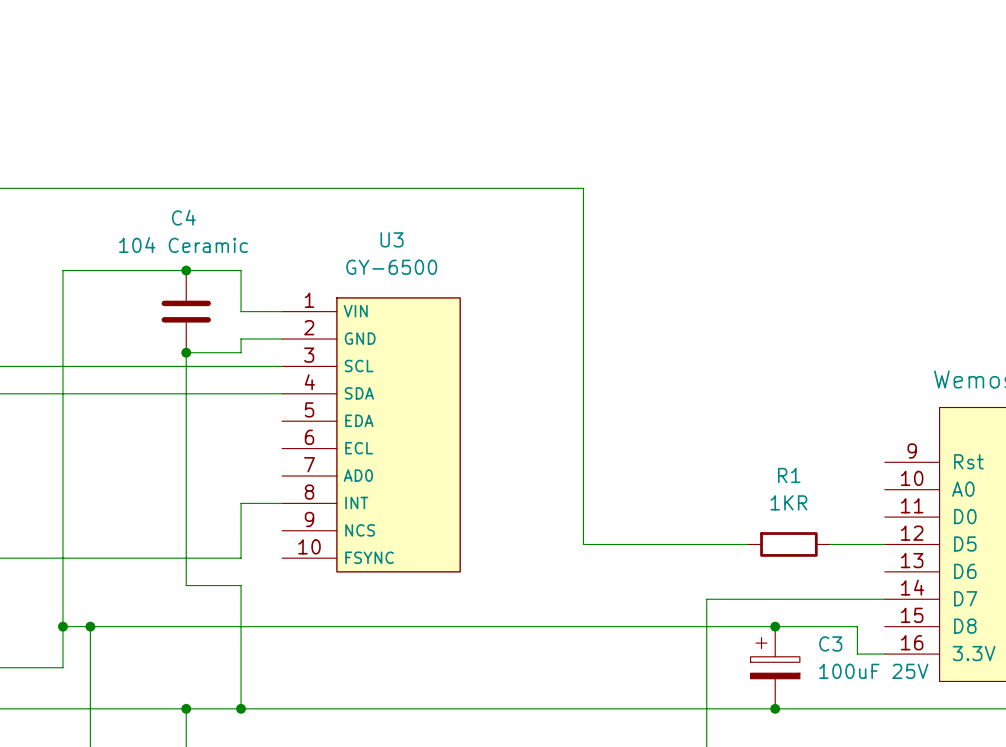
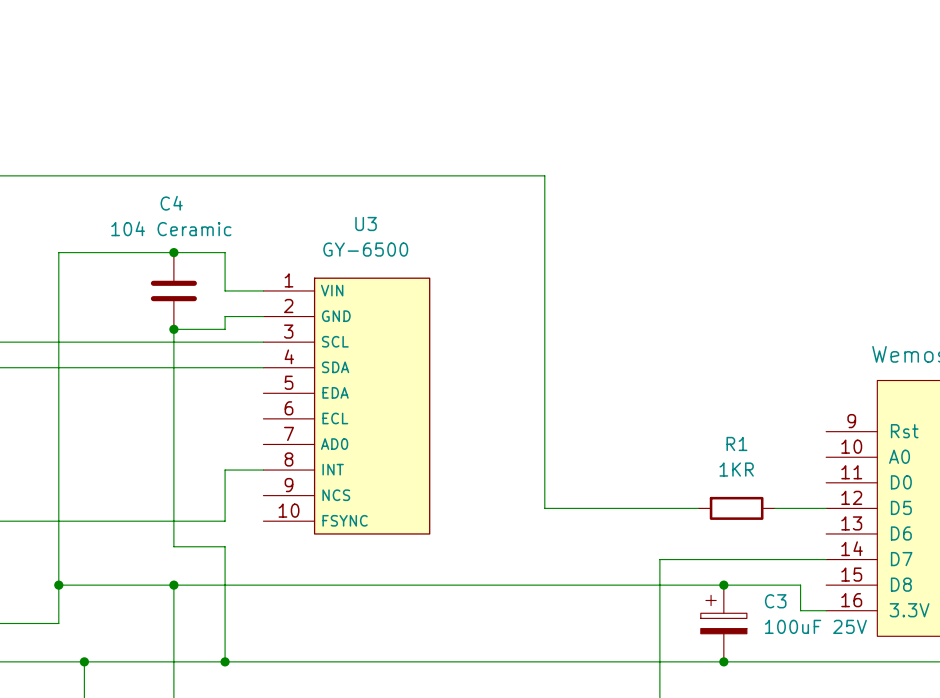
wire: (90, 626) (90, 708) -> (173, 585) (173, 661)
junction: (90, 626) -> none
junction: none -> (173, 585)
junction: none -> (84, 661)
junction: (186, 708) -> none

